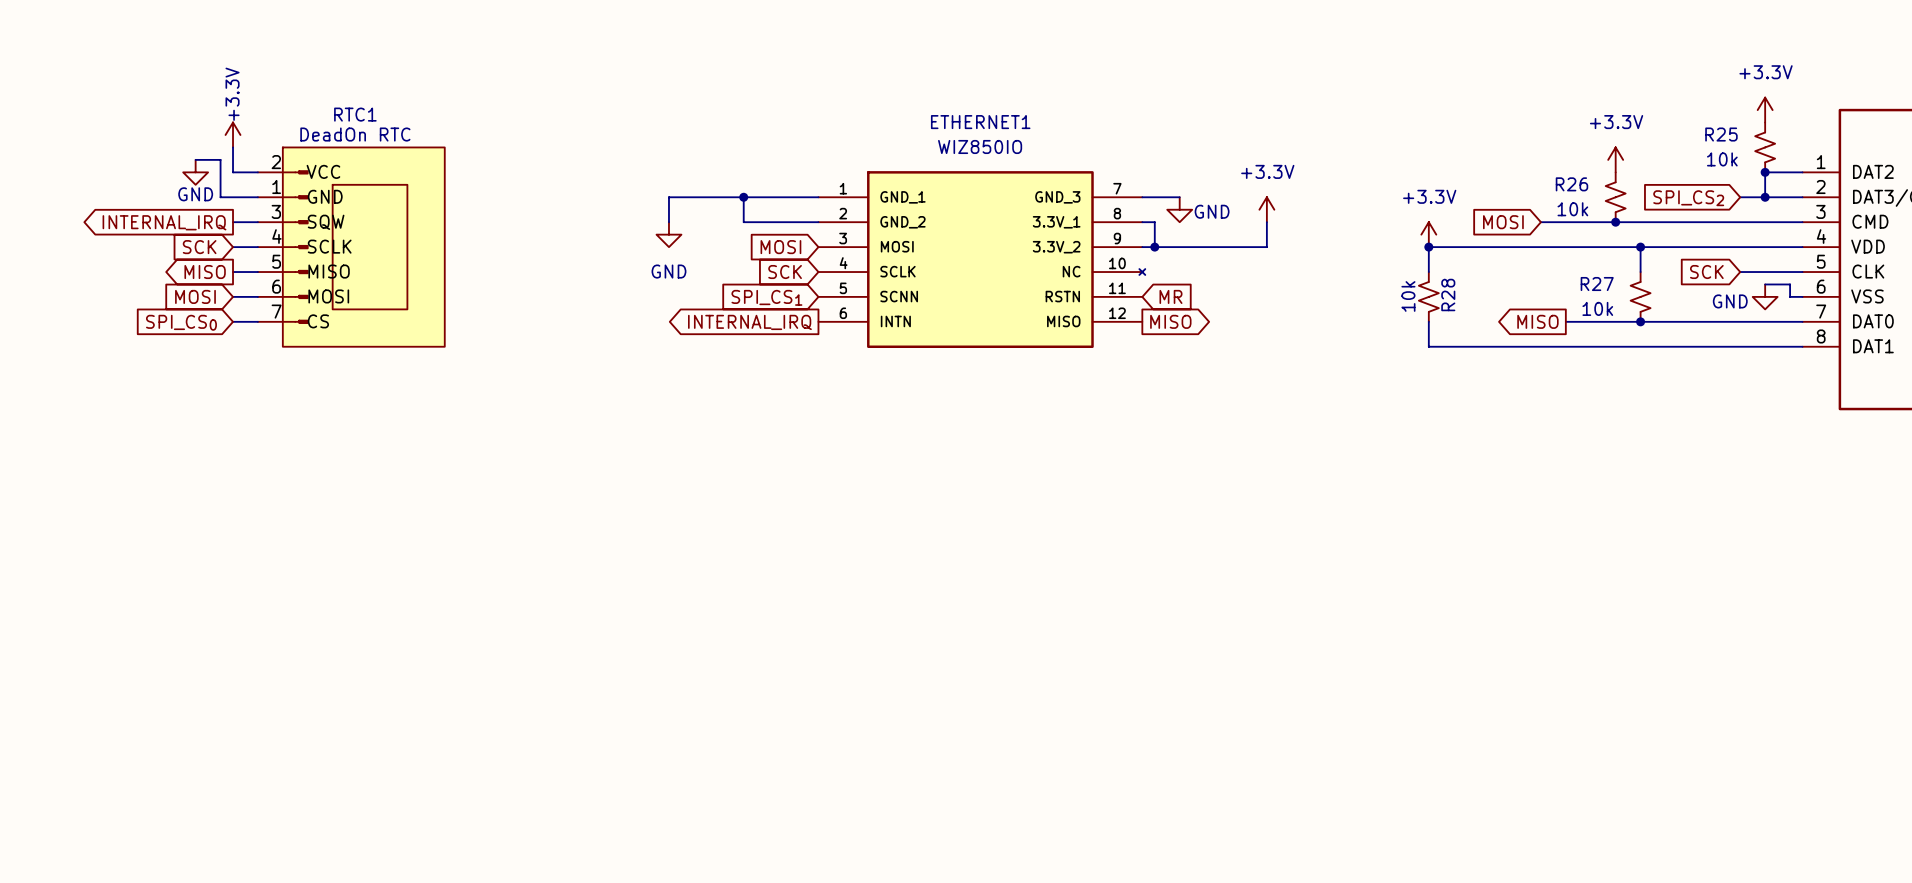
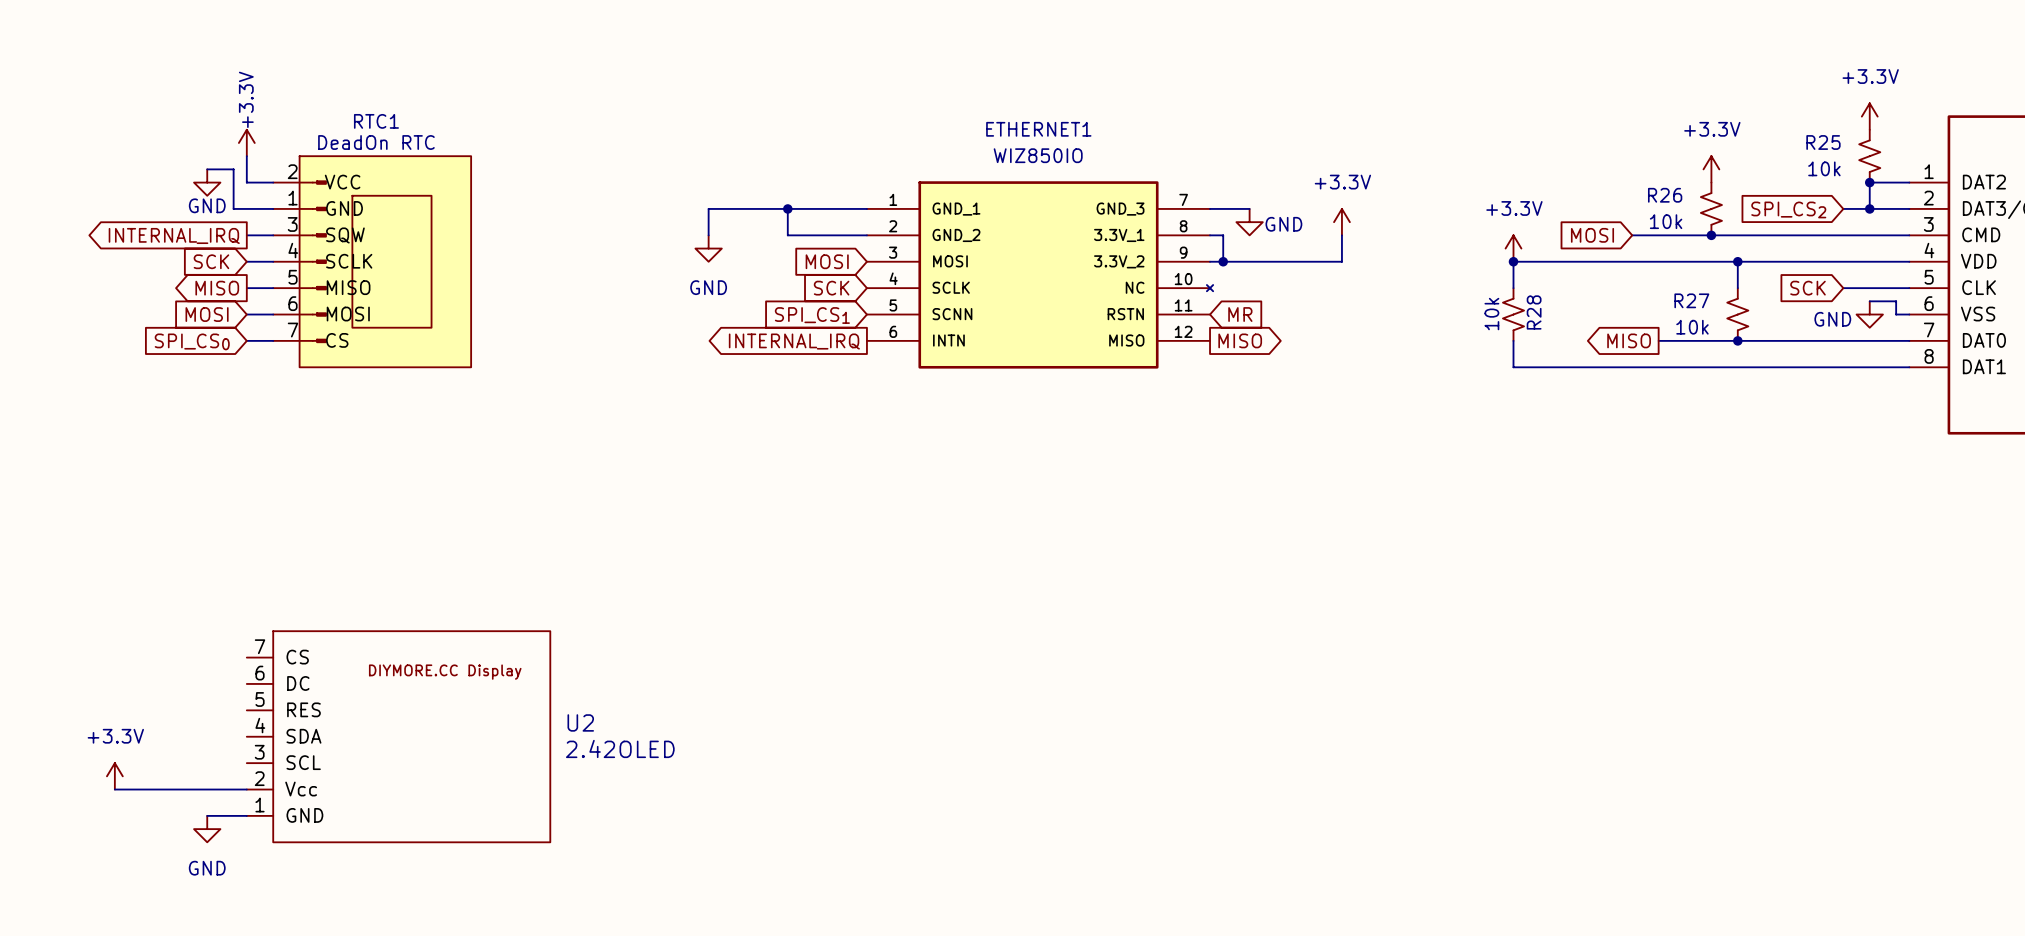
U2: none -> 2.42OLED (398, 736)
power symbol: none -> +3.3V (114, 776)
wire: none -> (114, 789) (246, 789)
wire: none -> (207, 815) (246, 815)
power symbol: none -> GND (207, 829)

